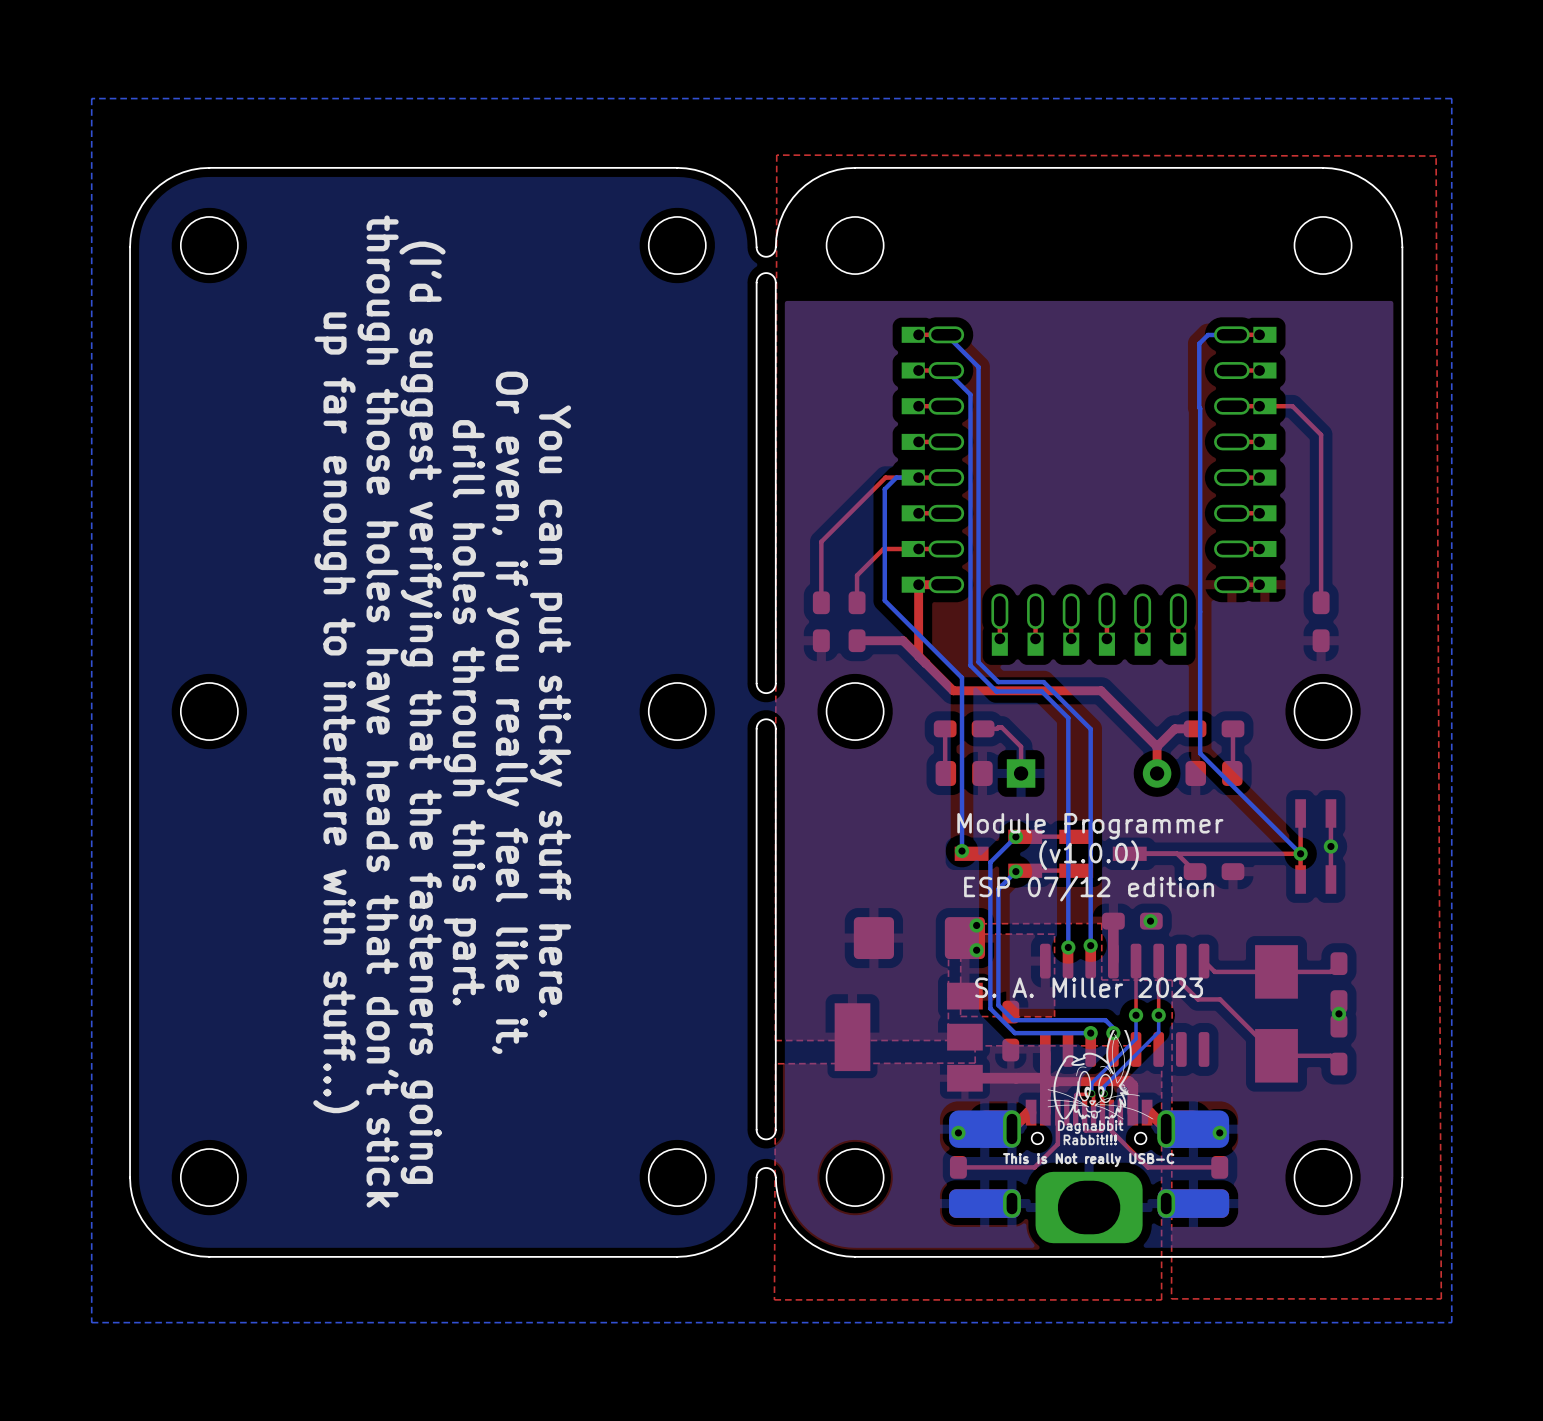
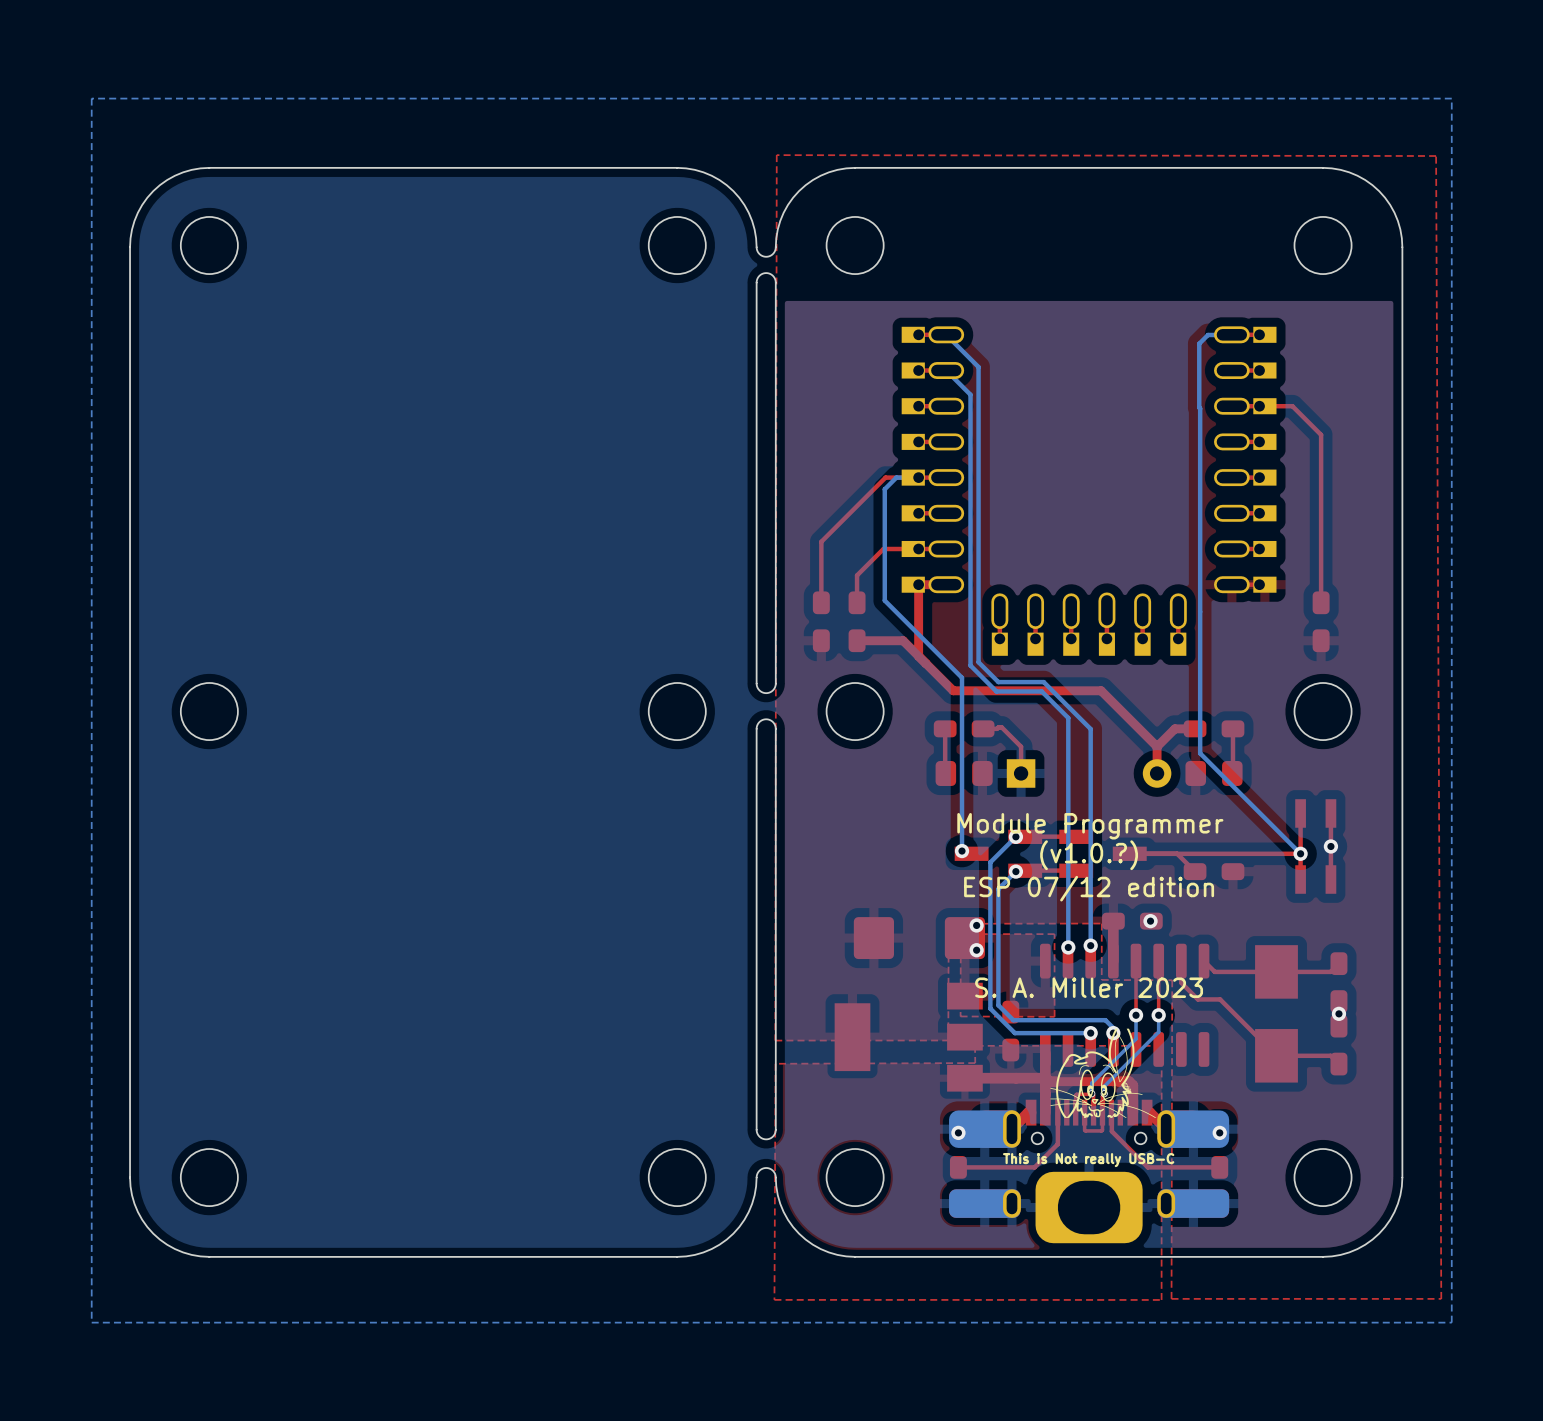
text: through those holes have heads that don't stick (378, 711) -> none
text: You can put sticky stuff here. (550, 711) -> none
text: up far enough to interfere with stuff...) (336, 712) -> none
text: (I'd suggest verifying that the fasteners going (422, 712) -> none
text: drill holes through this part. (464, 712) -> none
text: Or even, if you really feel like it, (507, 712) -> none
text: (v1.0.0) (1089, 855) -> (v1.0.?) (1089, 855)
drawing shape: [1047, 1029, 1154, 1146] -> [1050, 1028, 1157, 1118]

